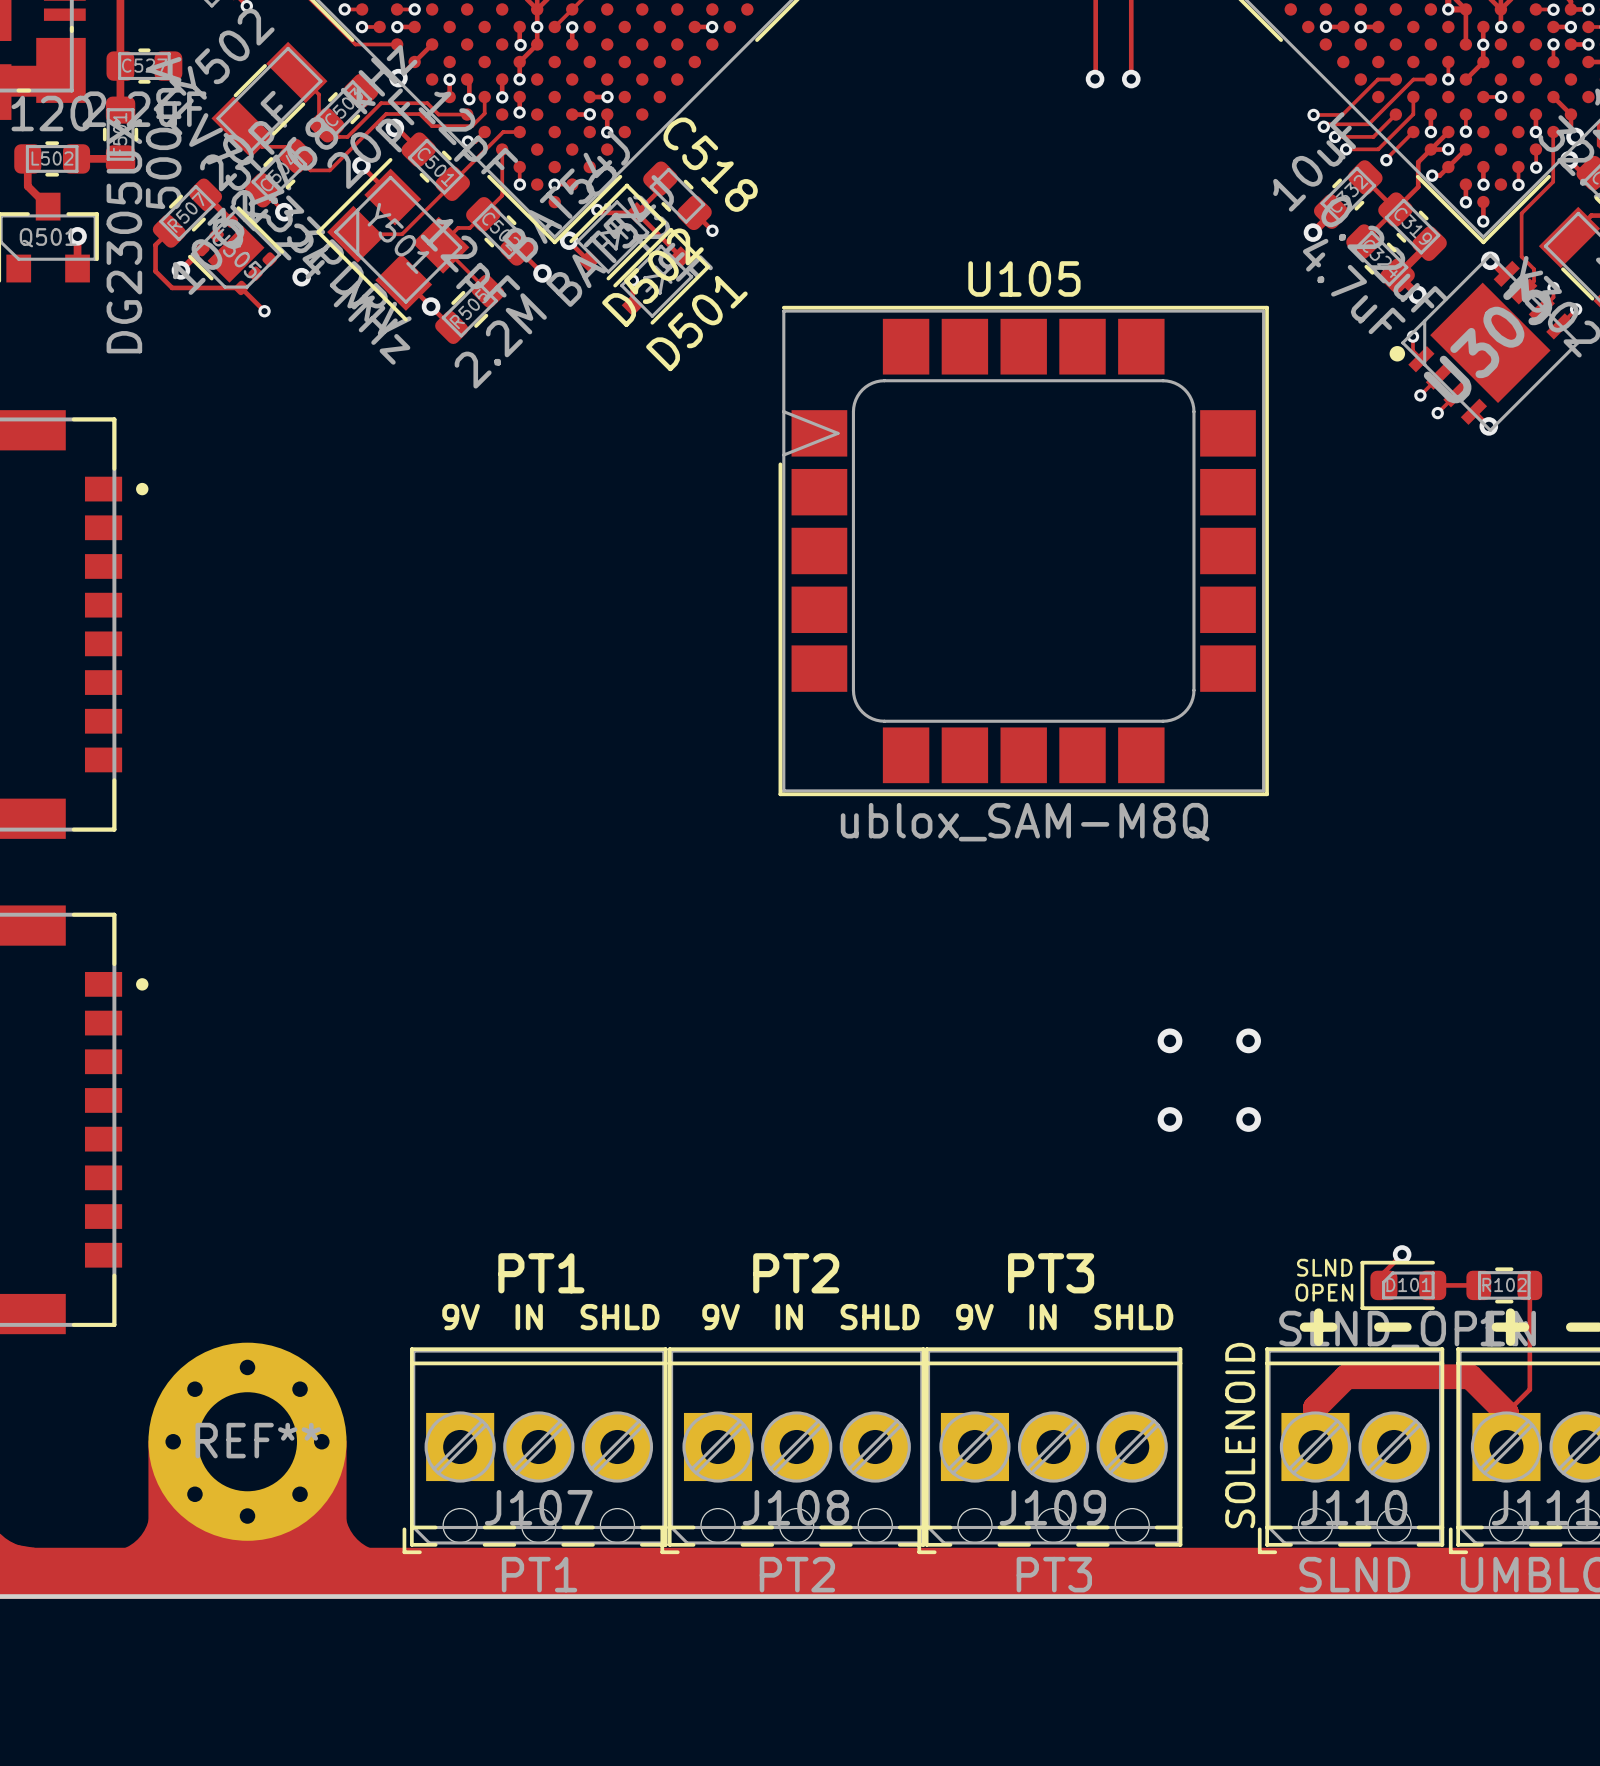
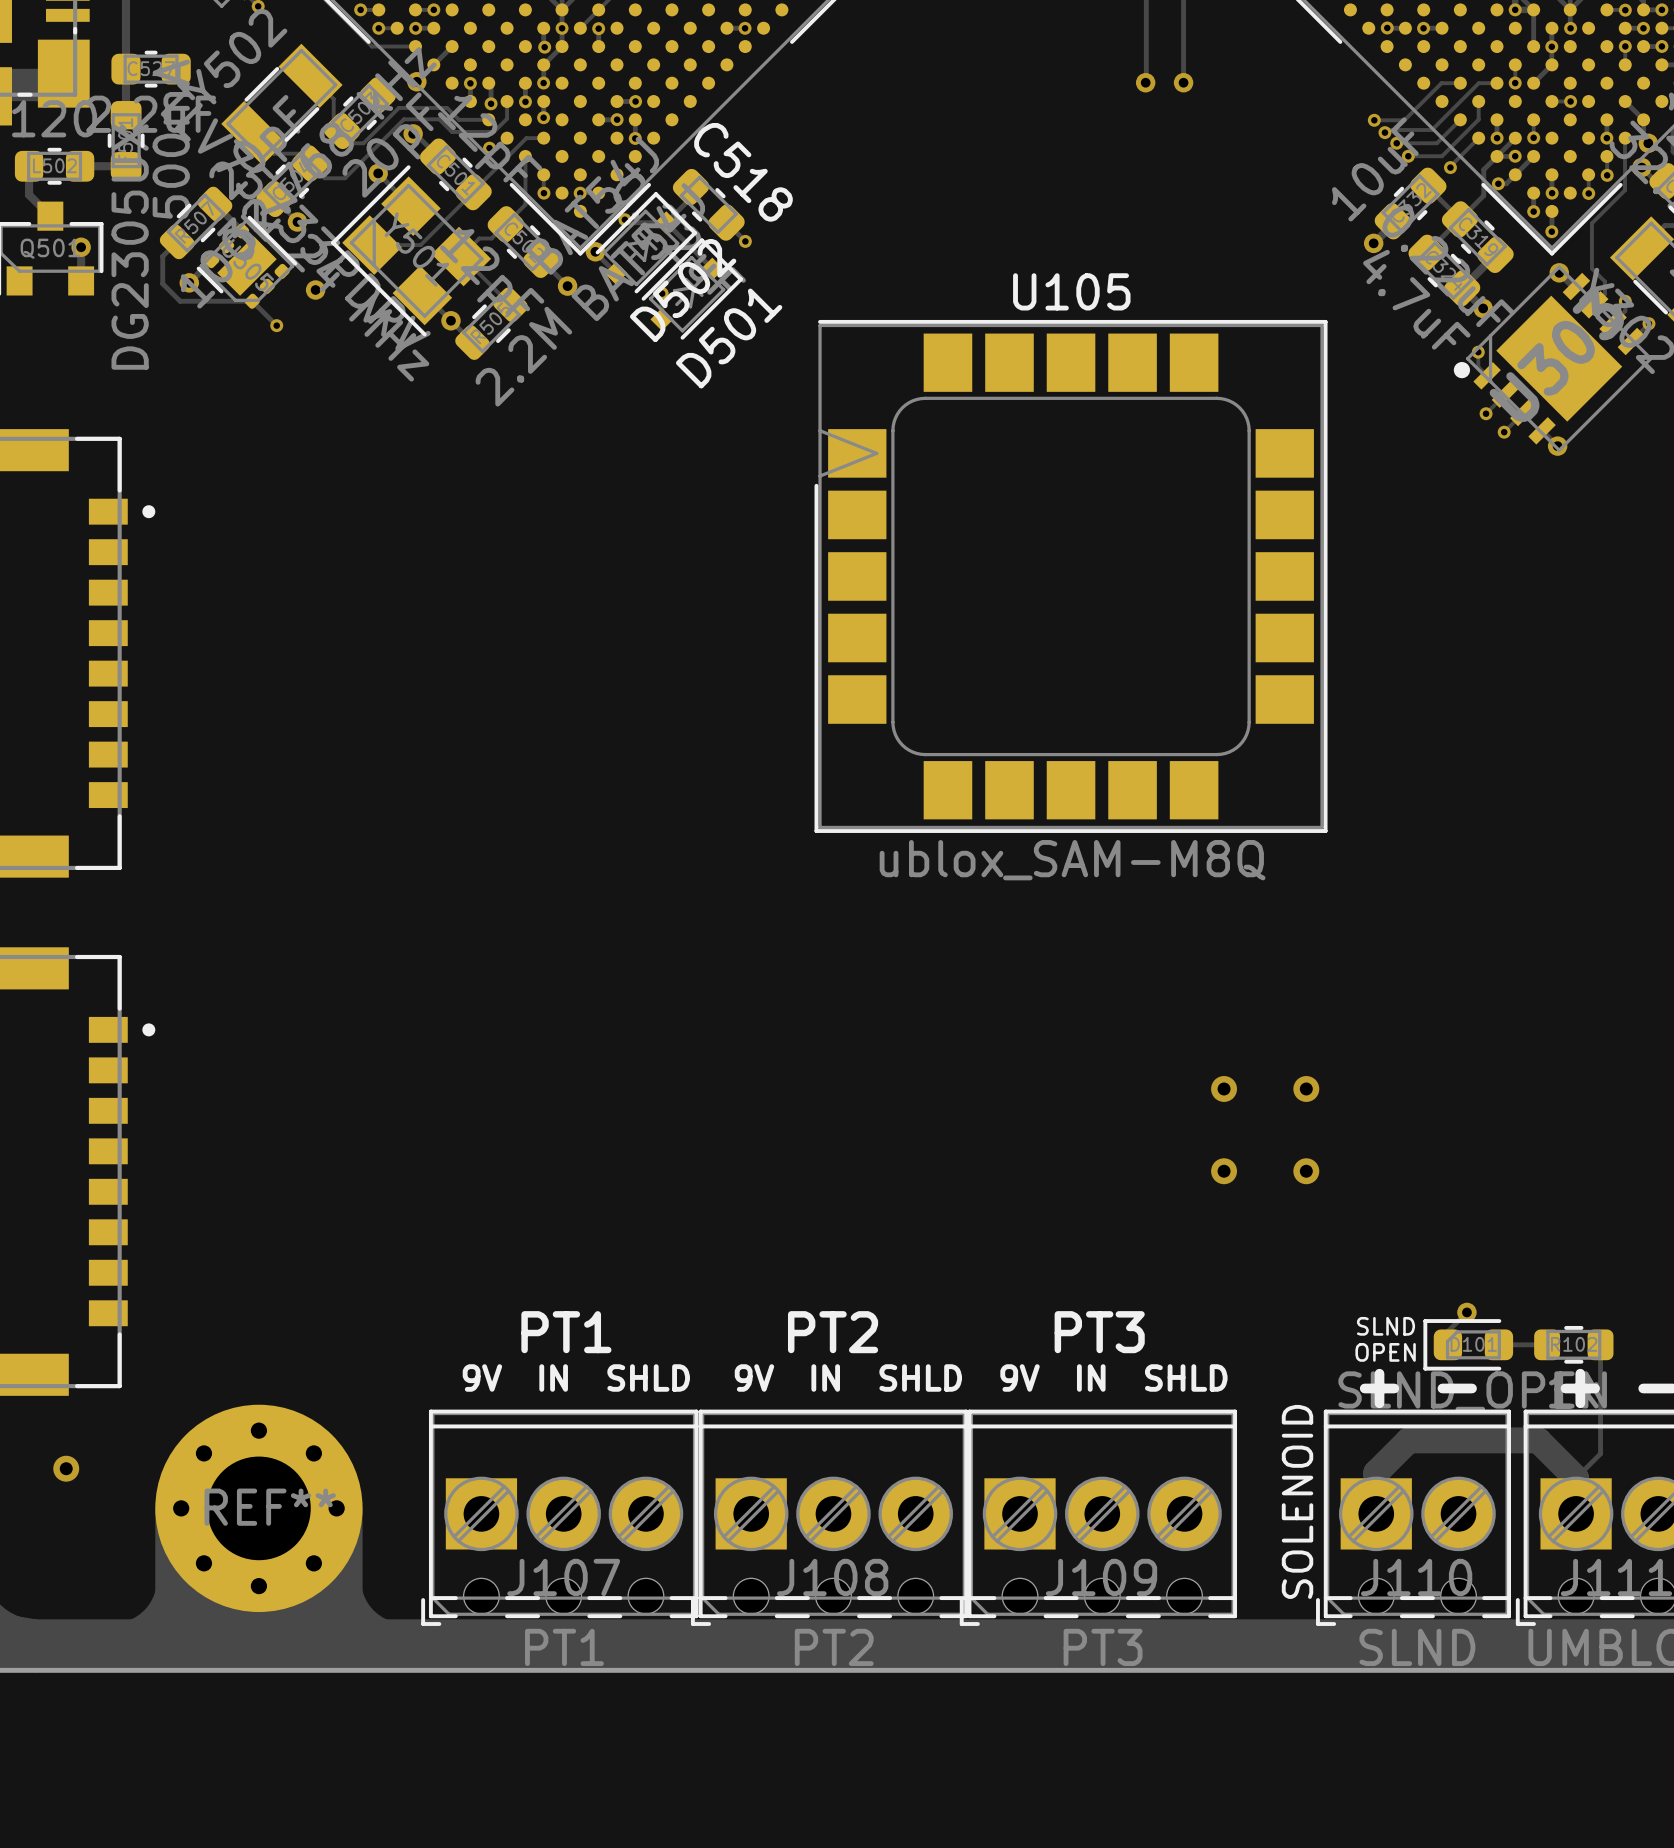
via: none -> (66, 1468)

